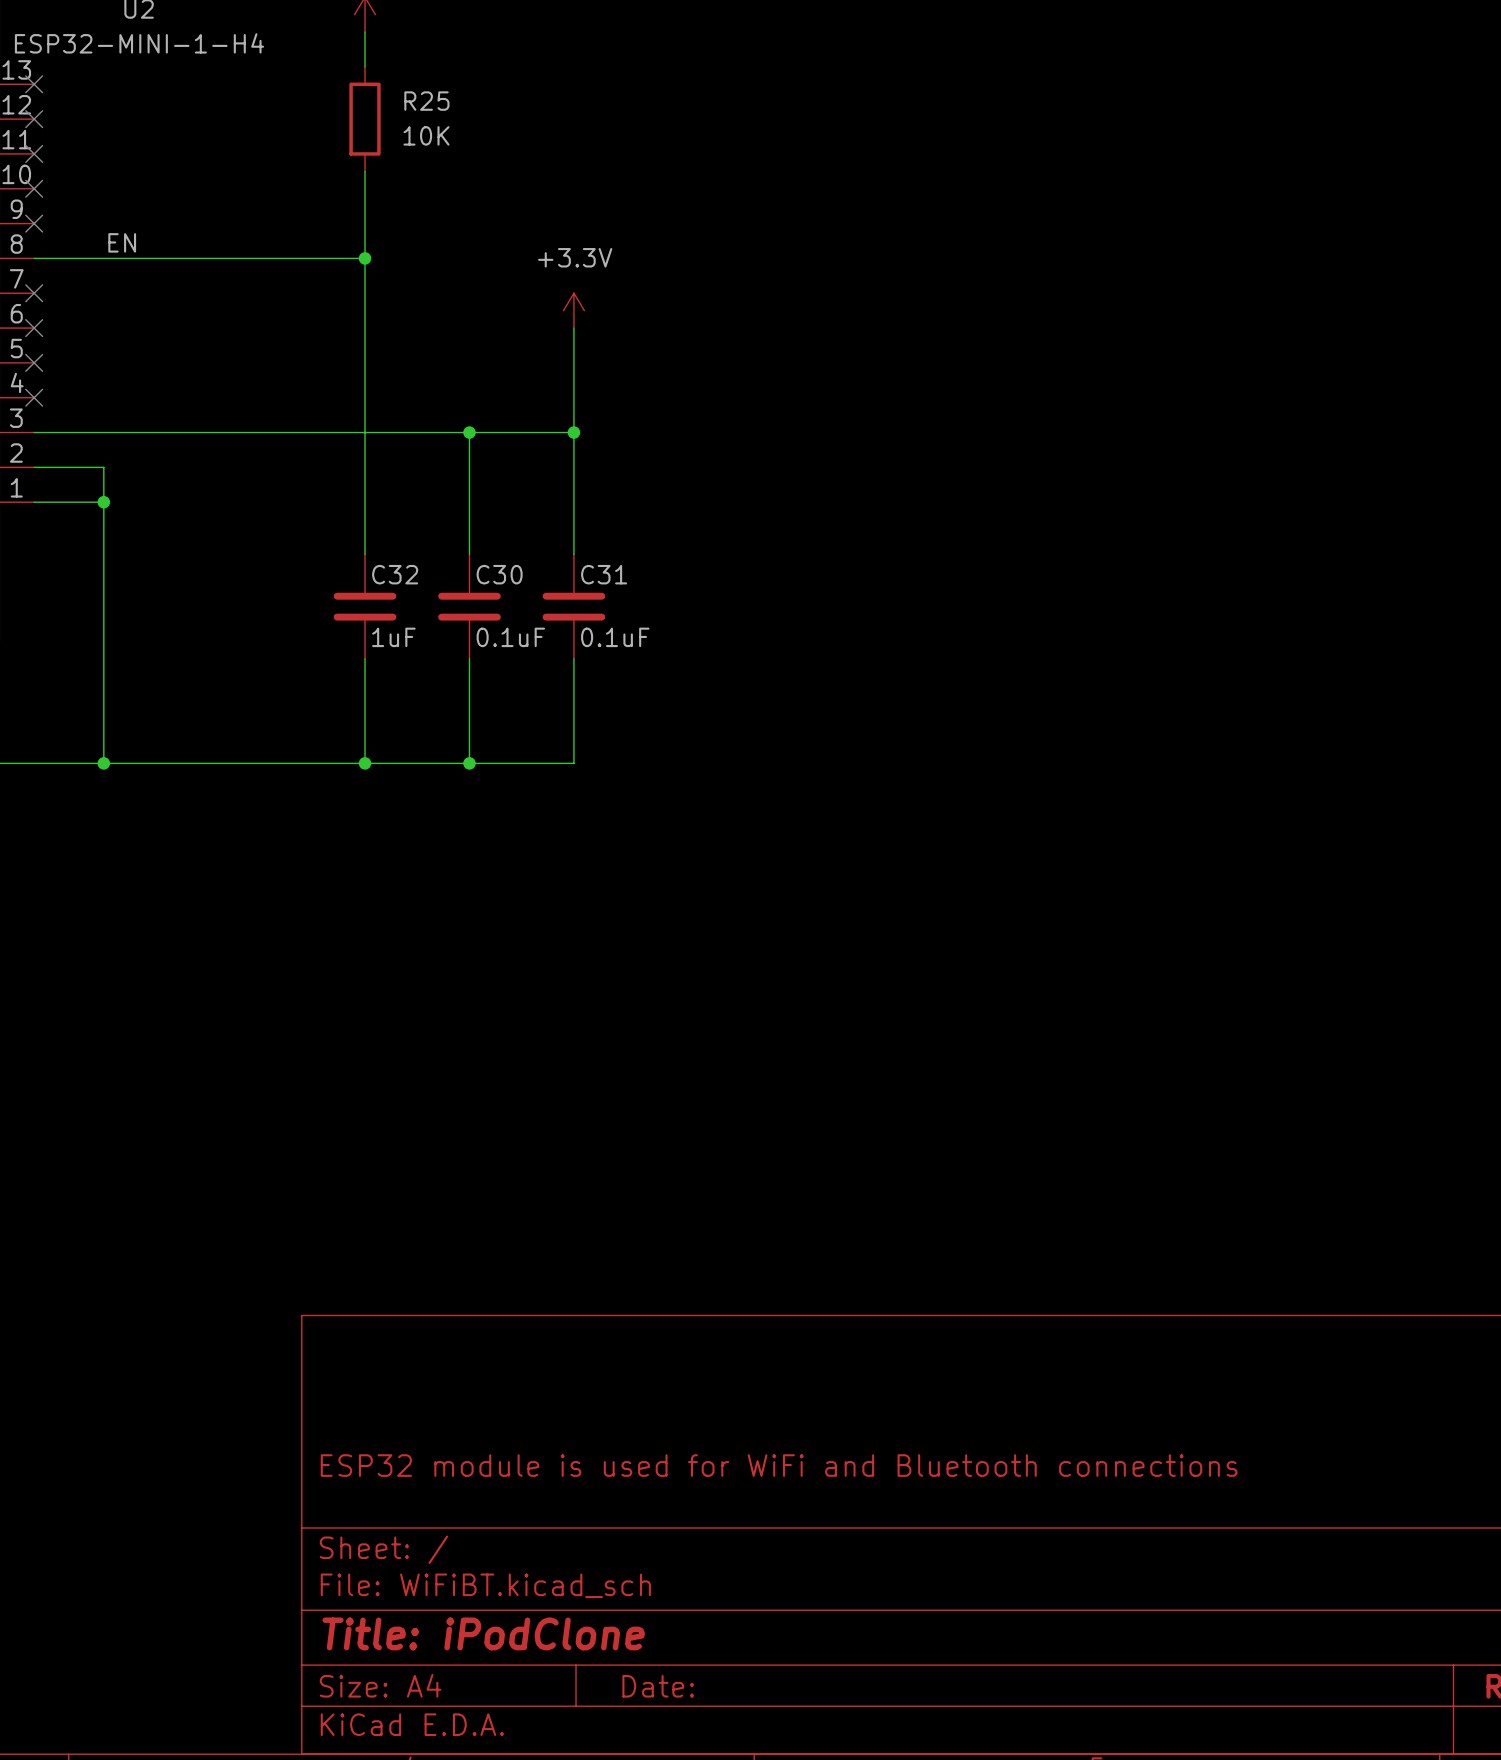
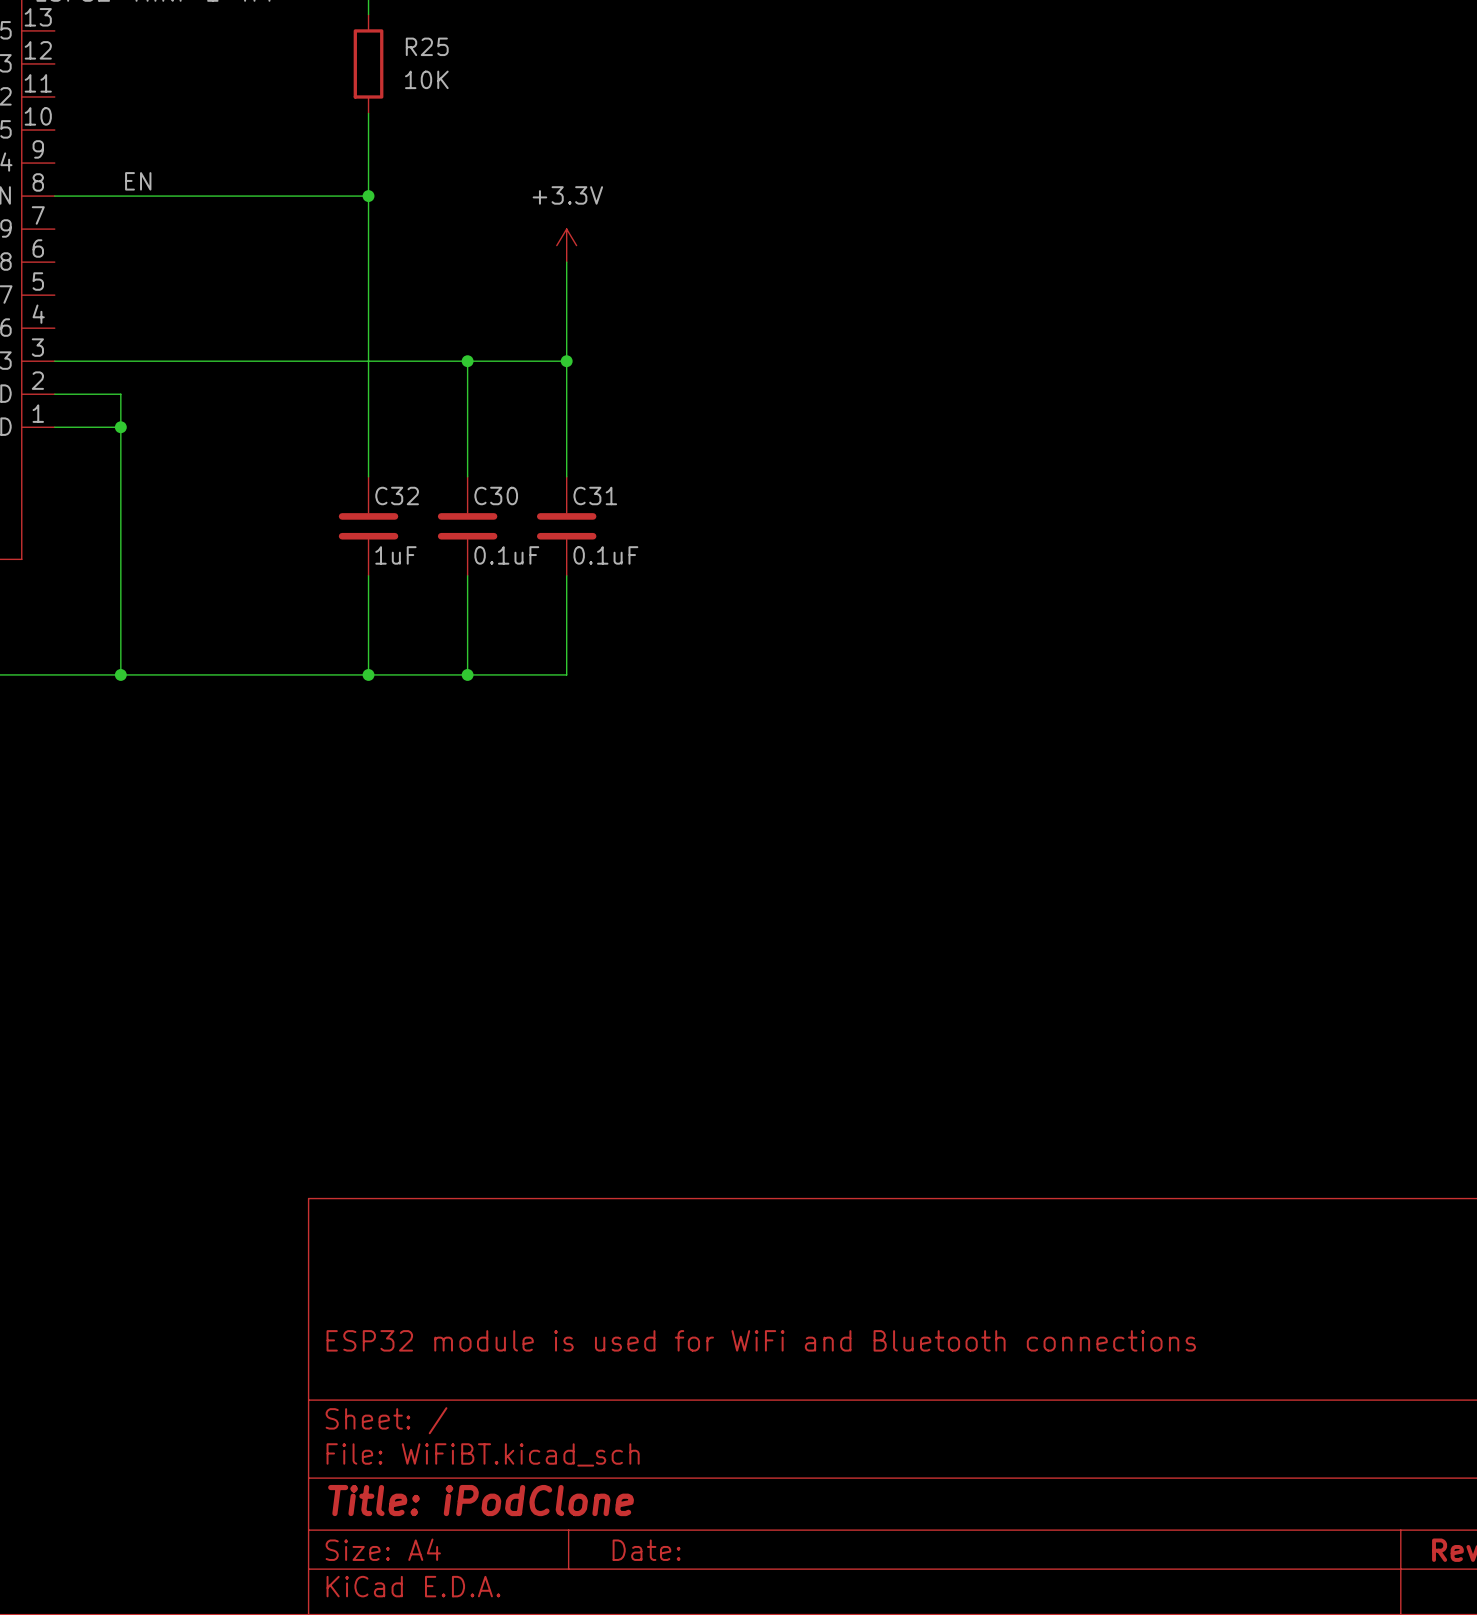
no-connect mark: (34, 84) -> none
no-connect mark: (34, 119) -> none
no-connect mark: (34, 153) -> none
no-connect mark: (34, 188) -> none
no-connect mark: (34, 223) -> none
no-connect mark: (34, 293) -> none
no-connect mark: (34, 328) -> none
no-connect mark: (34, 362) -> none
no-connect mark: (34, 397) -> none

